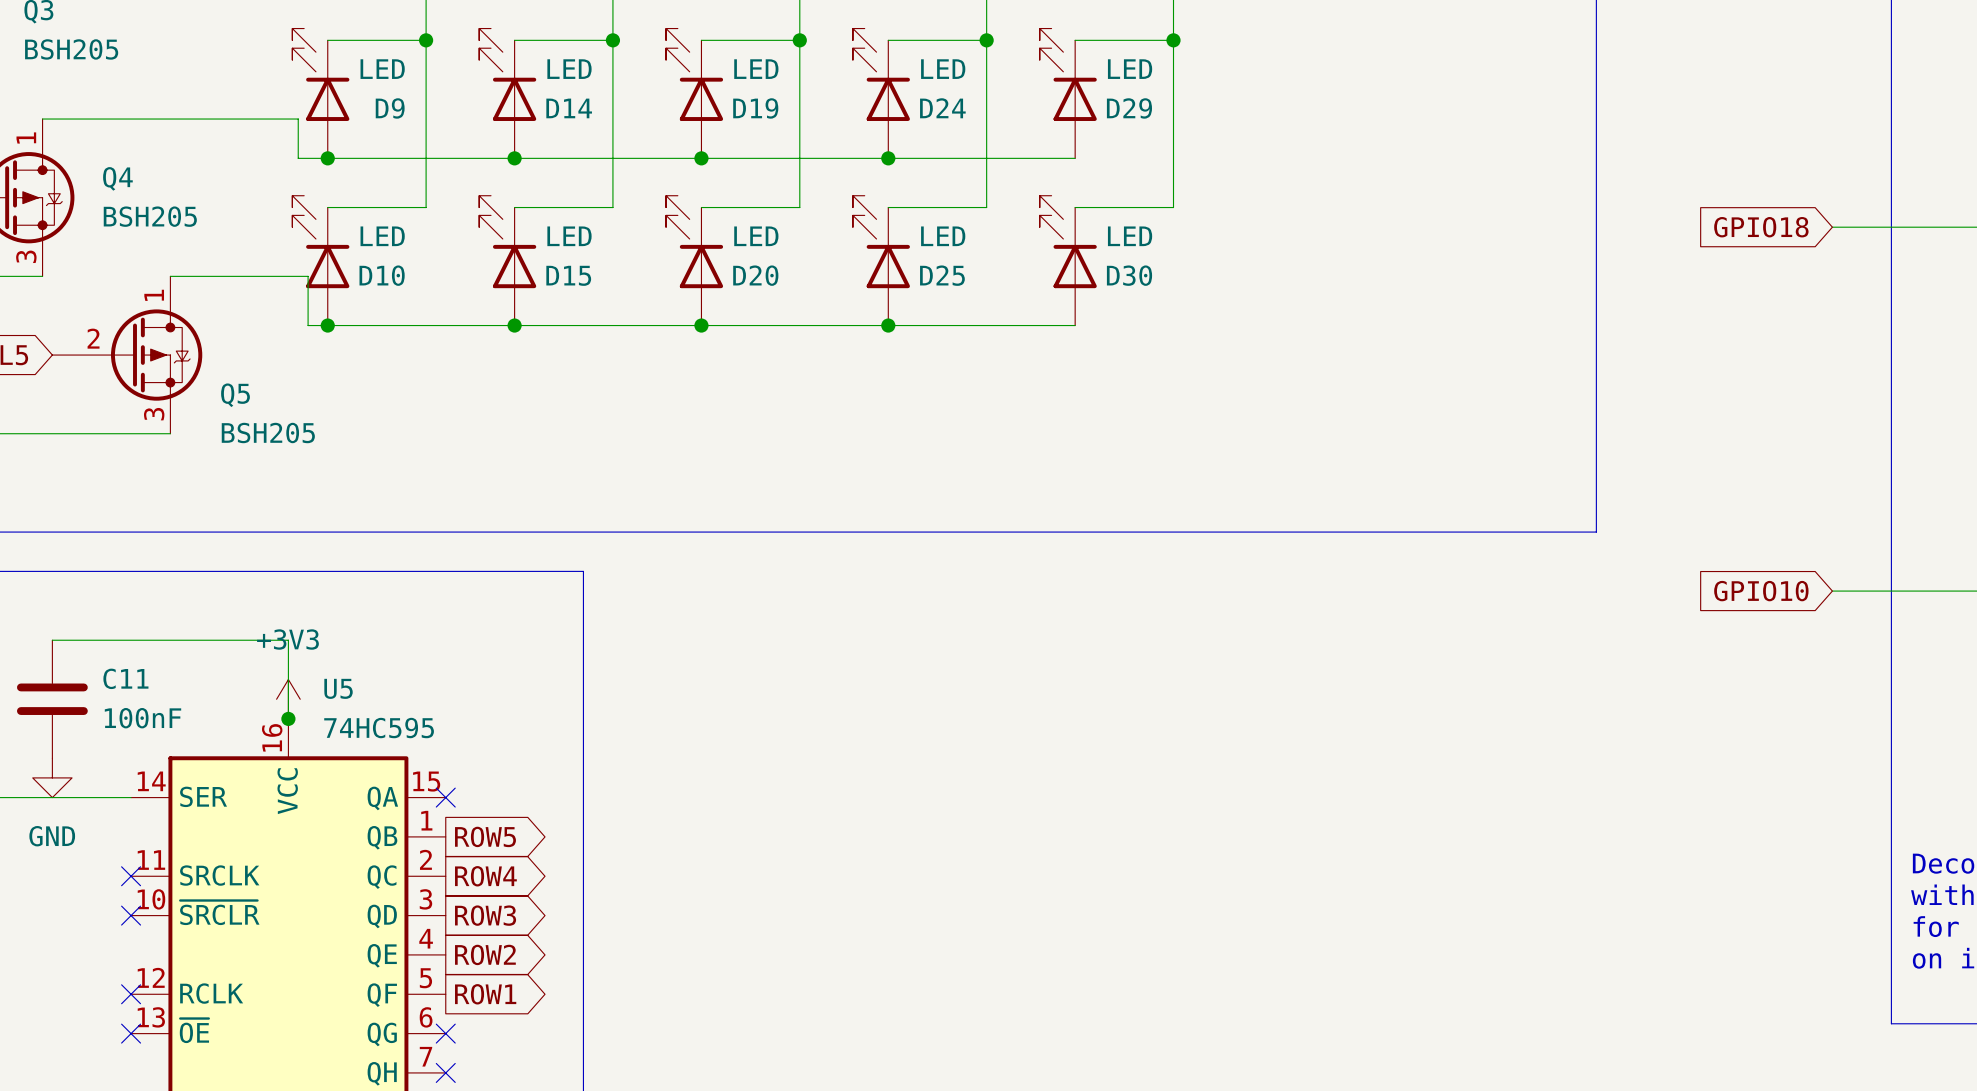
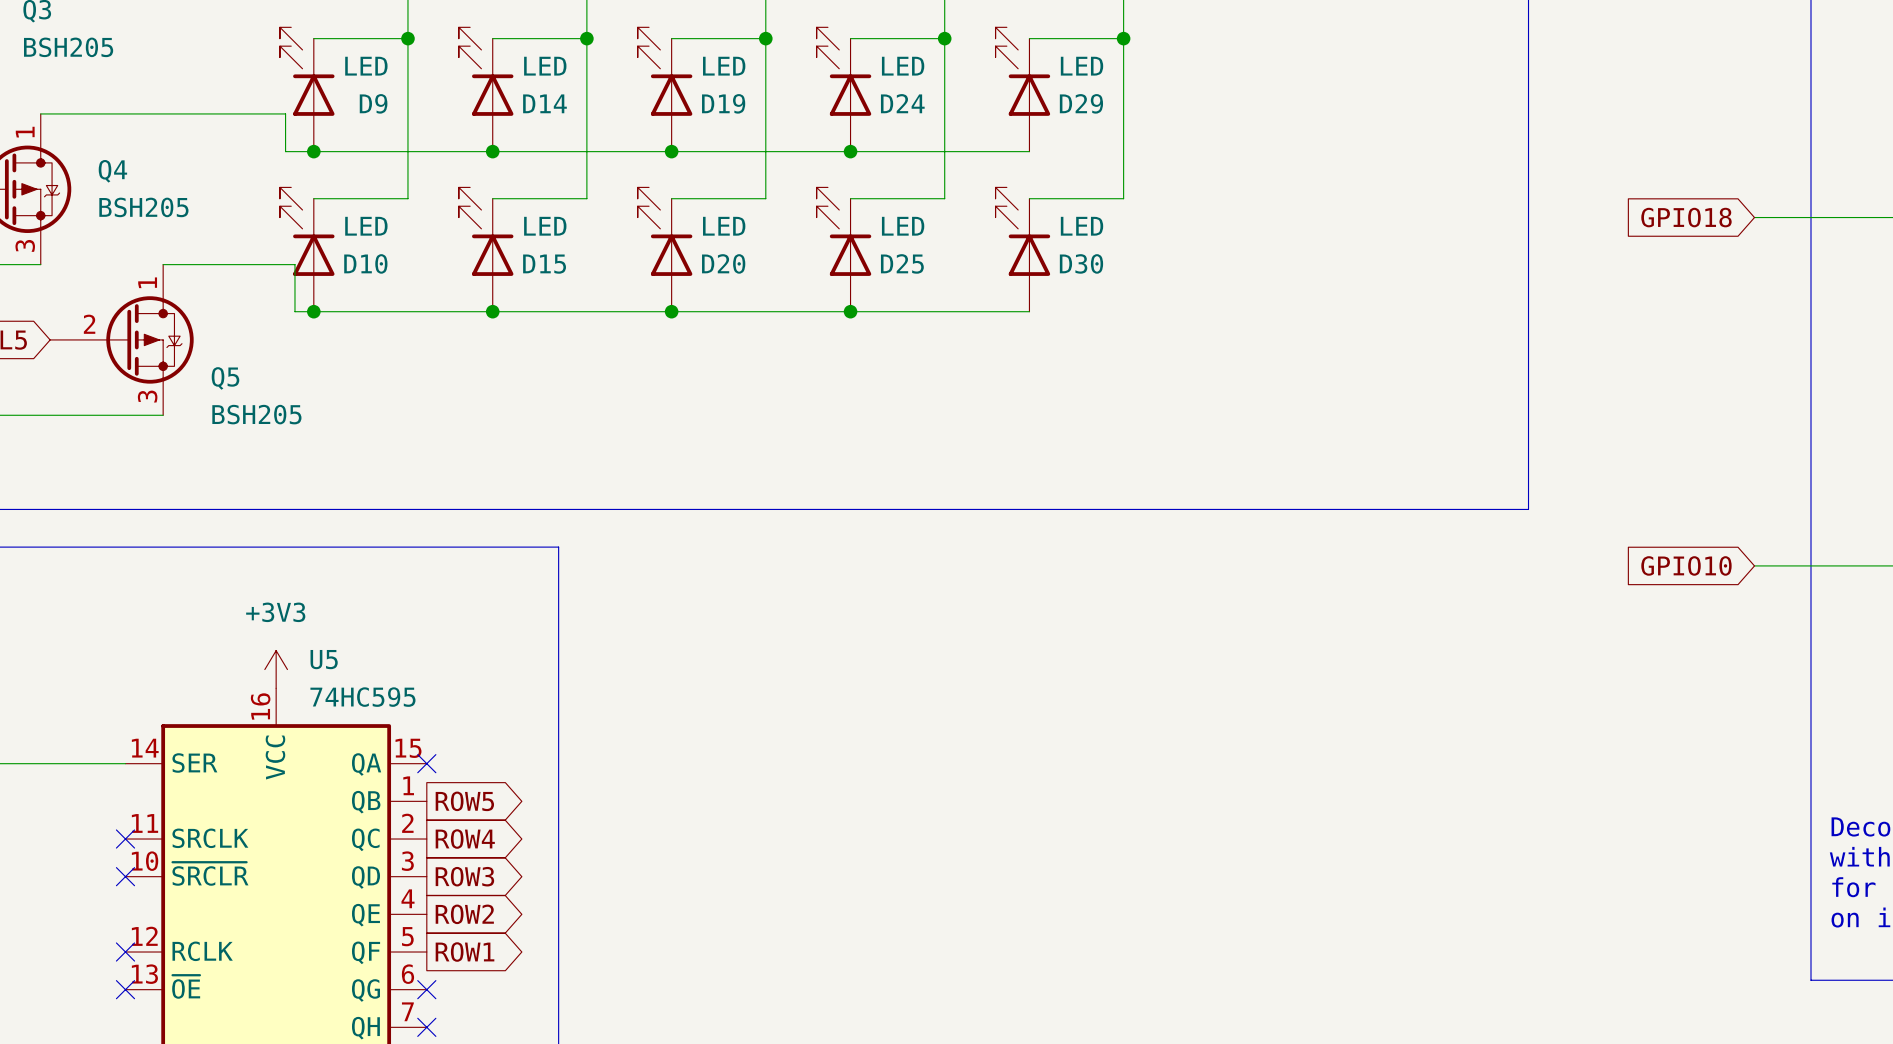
wire: (52, 640) (288, 640) (288, 718) -> none
C11: 100nF (52, 699) -> none
junction: (288, 718) -> none
power symbol: GND (52, 777) -> none

